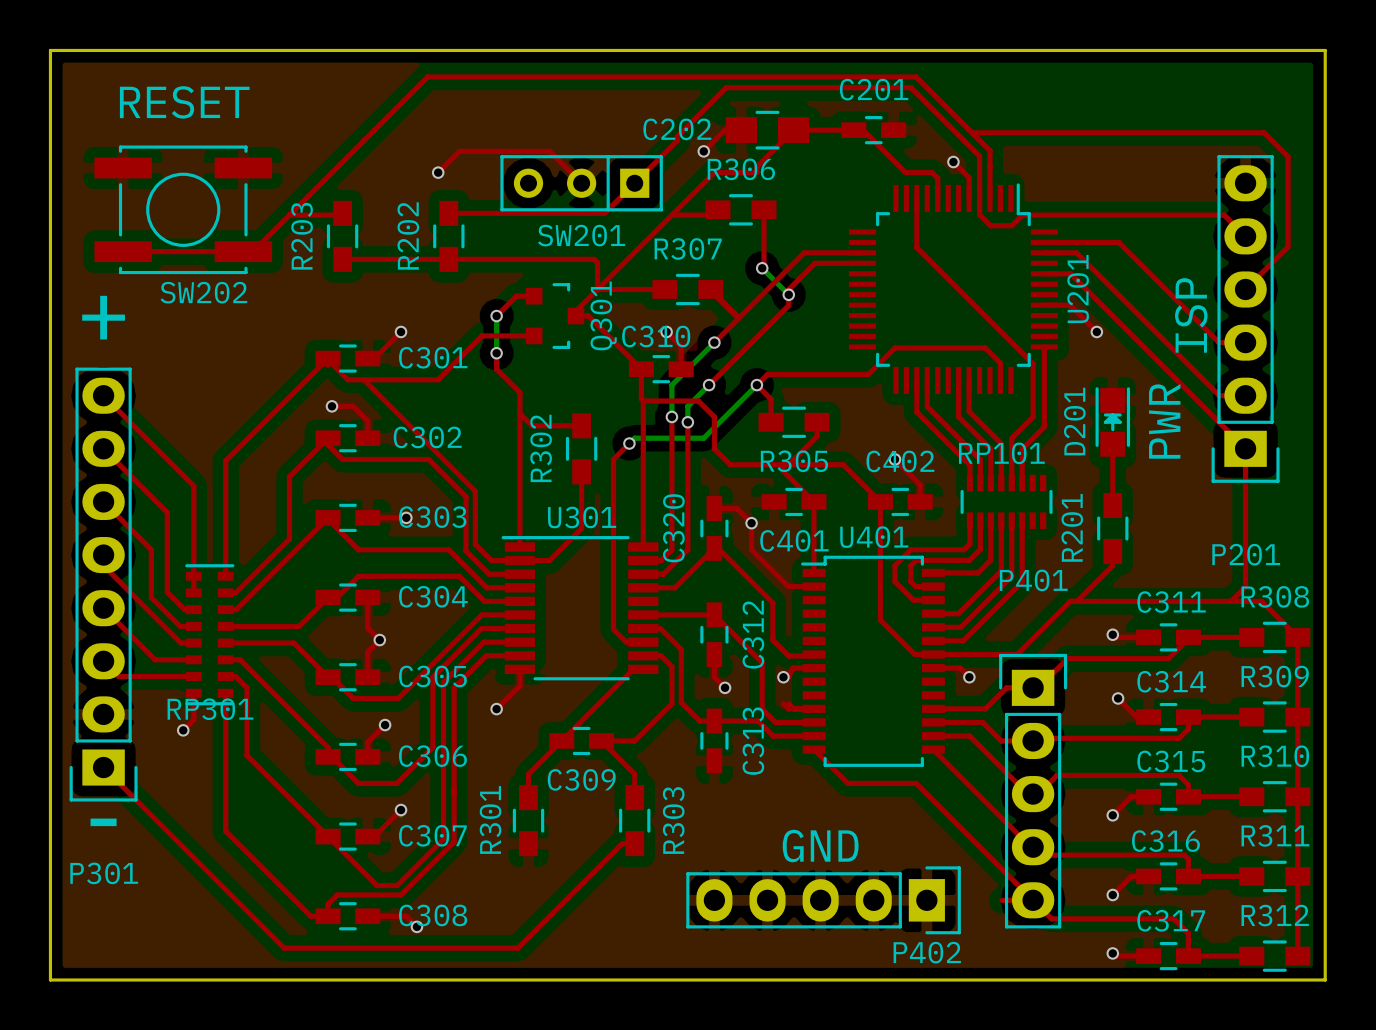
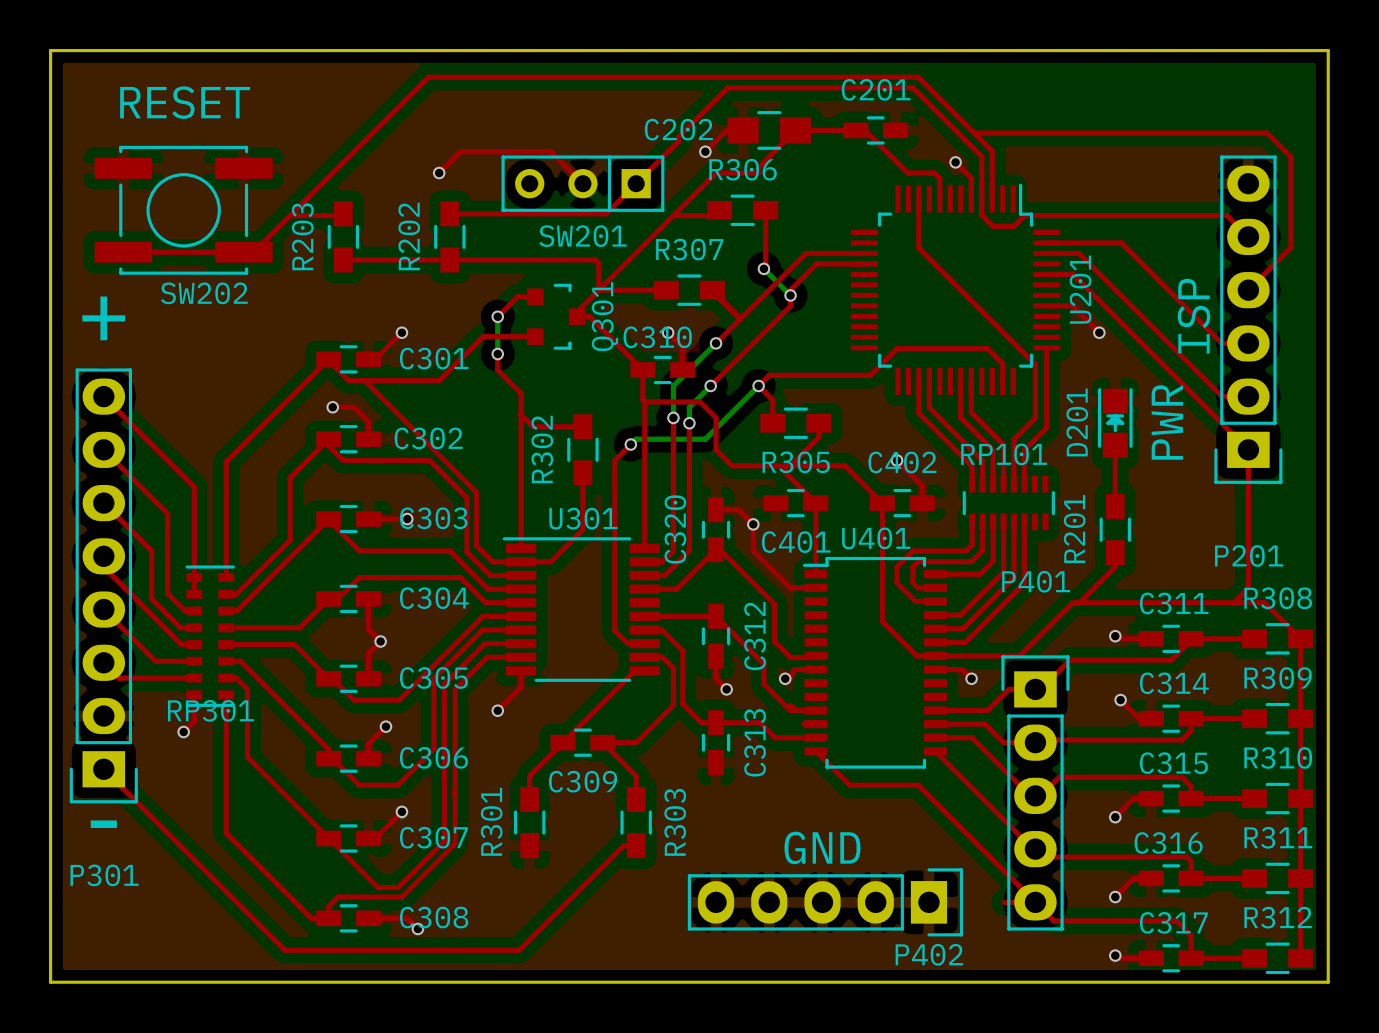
top track: (762, 682) (762, 709) (775, 722) (802, 722) -> (763, 684) (785, 705)

